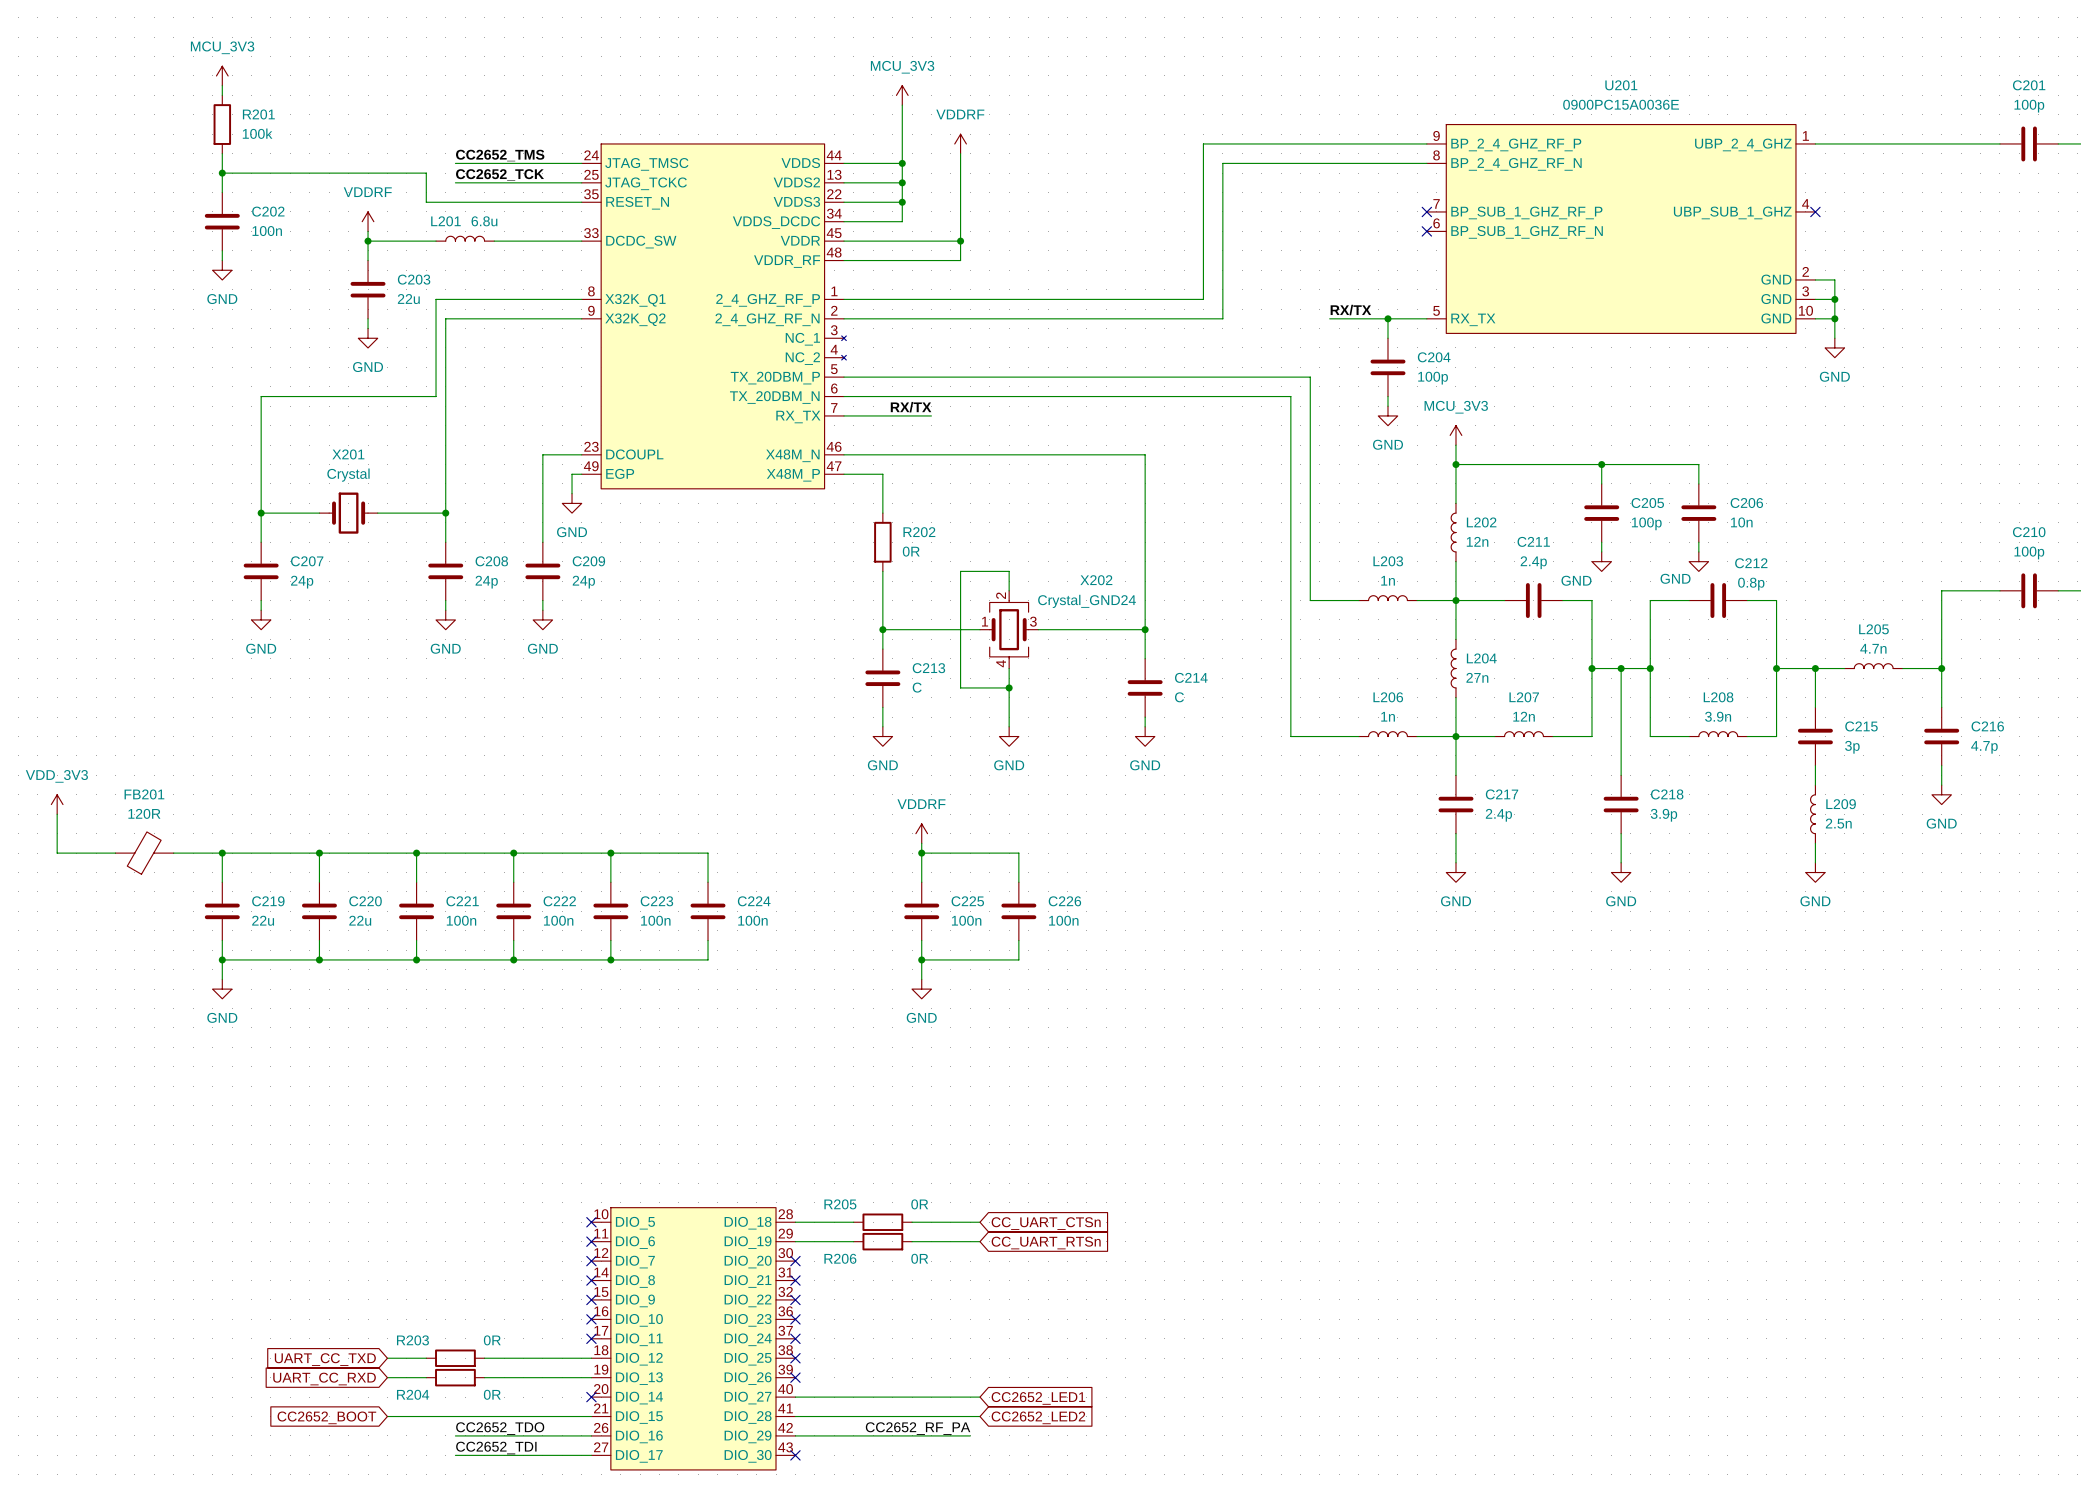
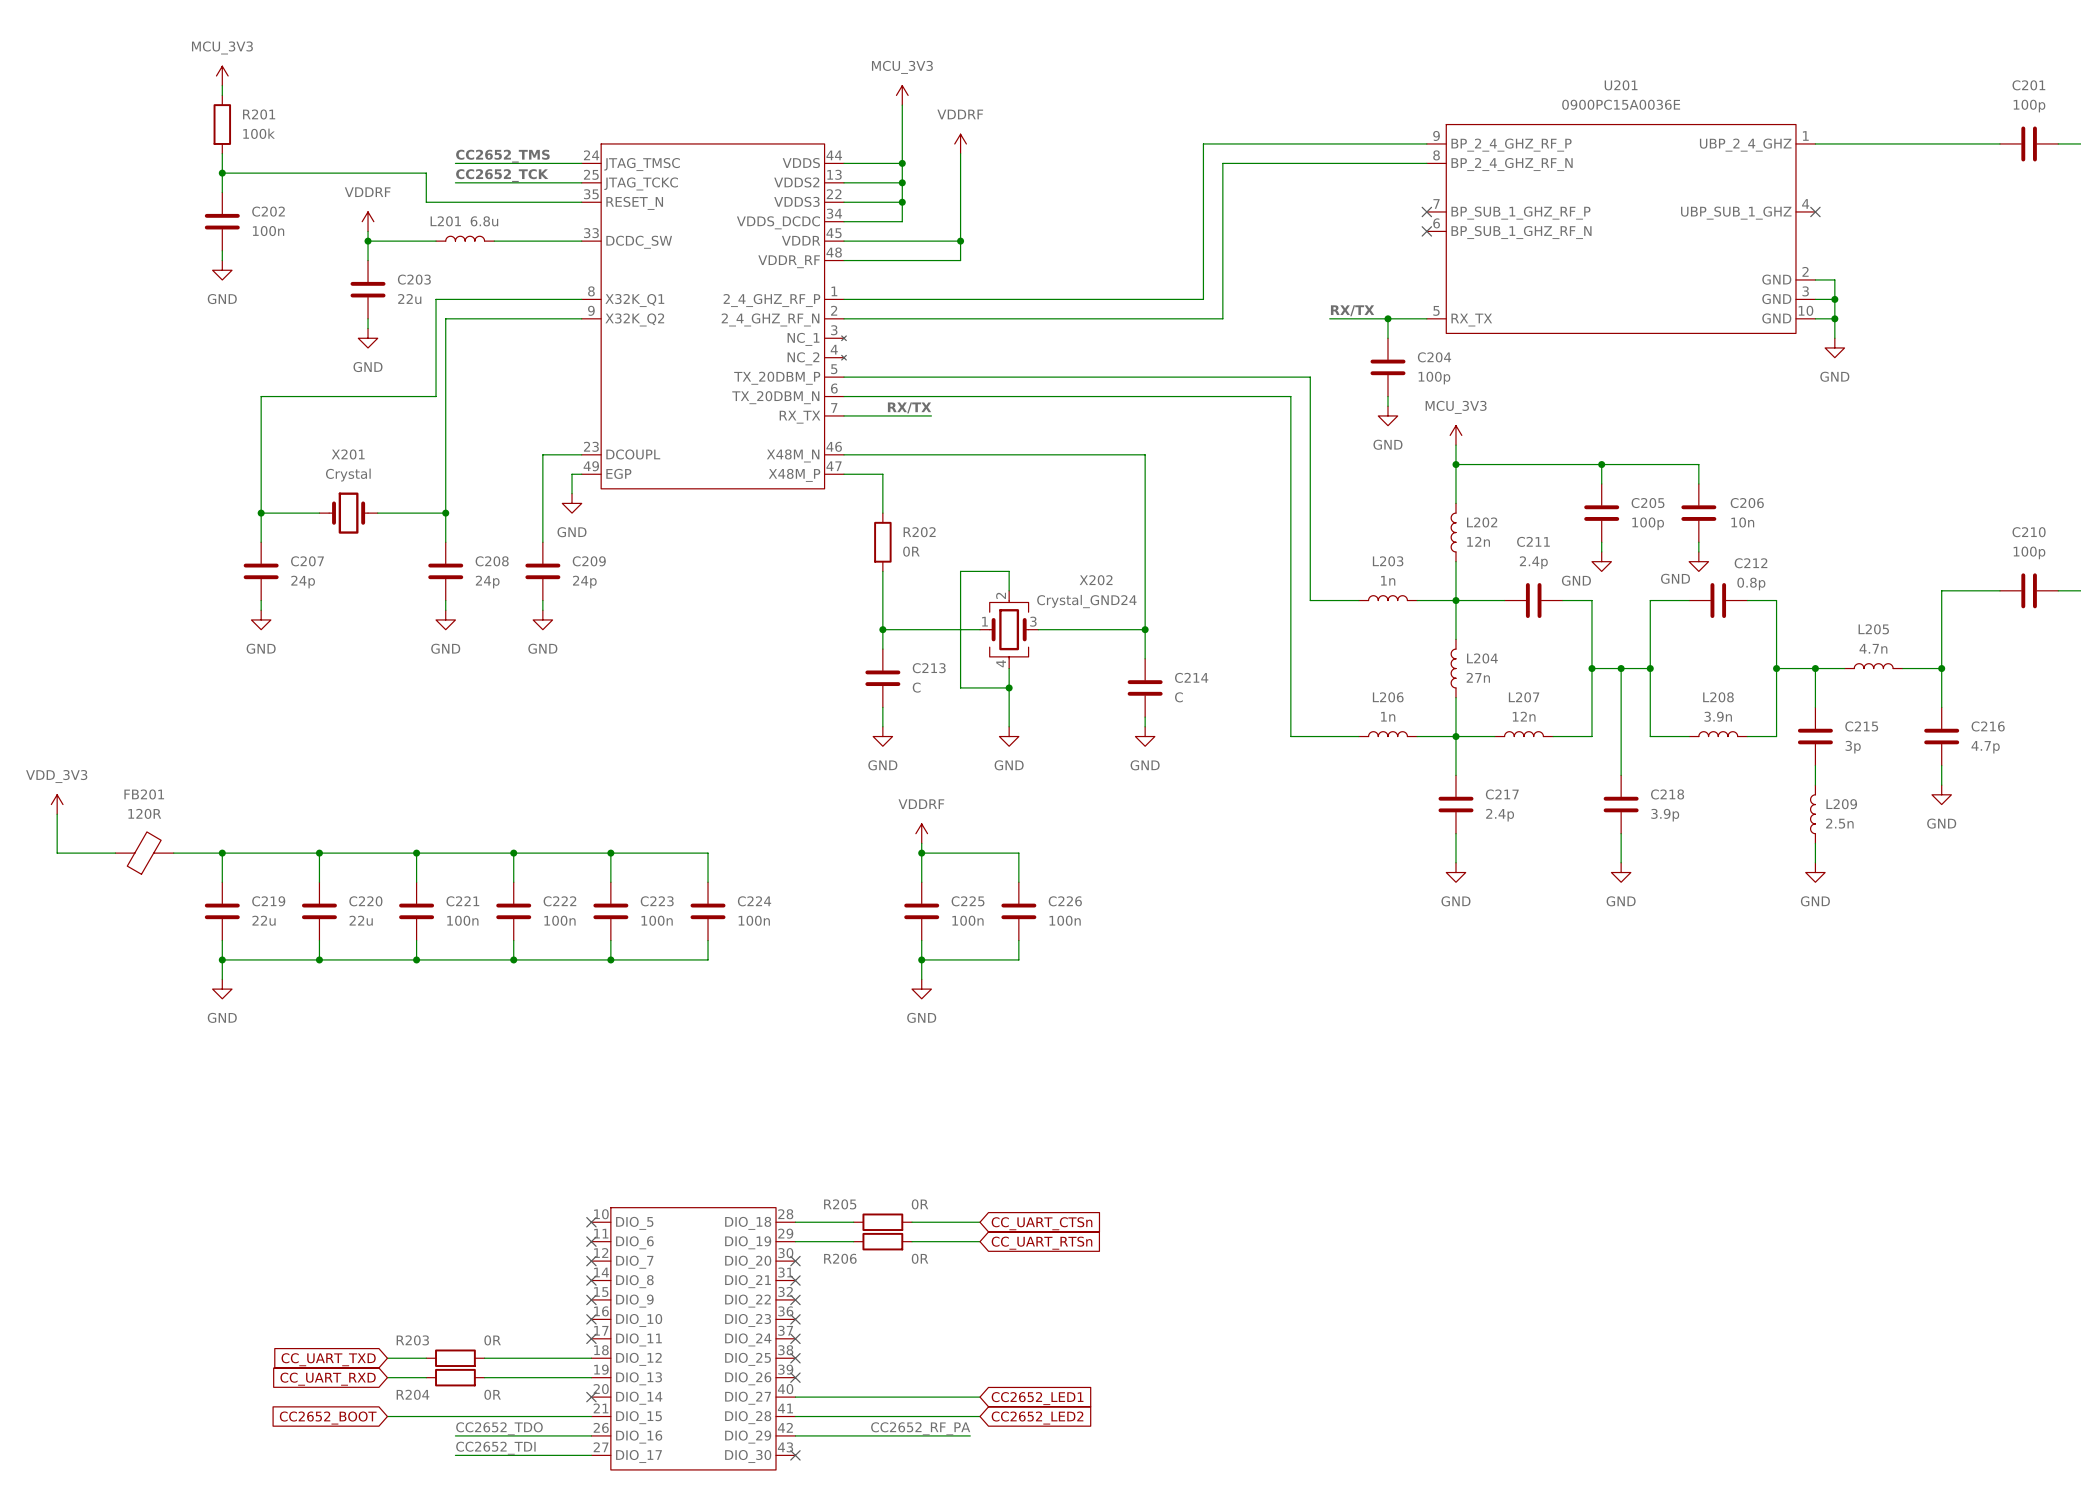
global label: UART_CC_TXD (325, 1359) -> CC_UART_TXD (328, 1359)
global label: UART_CC_RXD (324, 1378) -> CC_UART_RXD (328, 1379)

